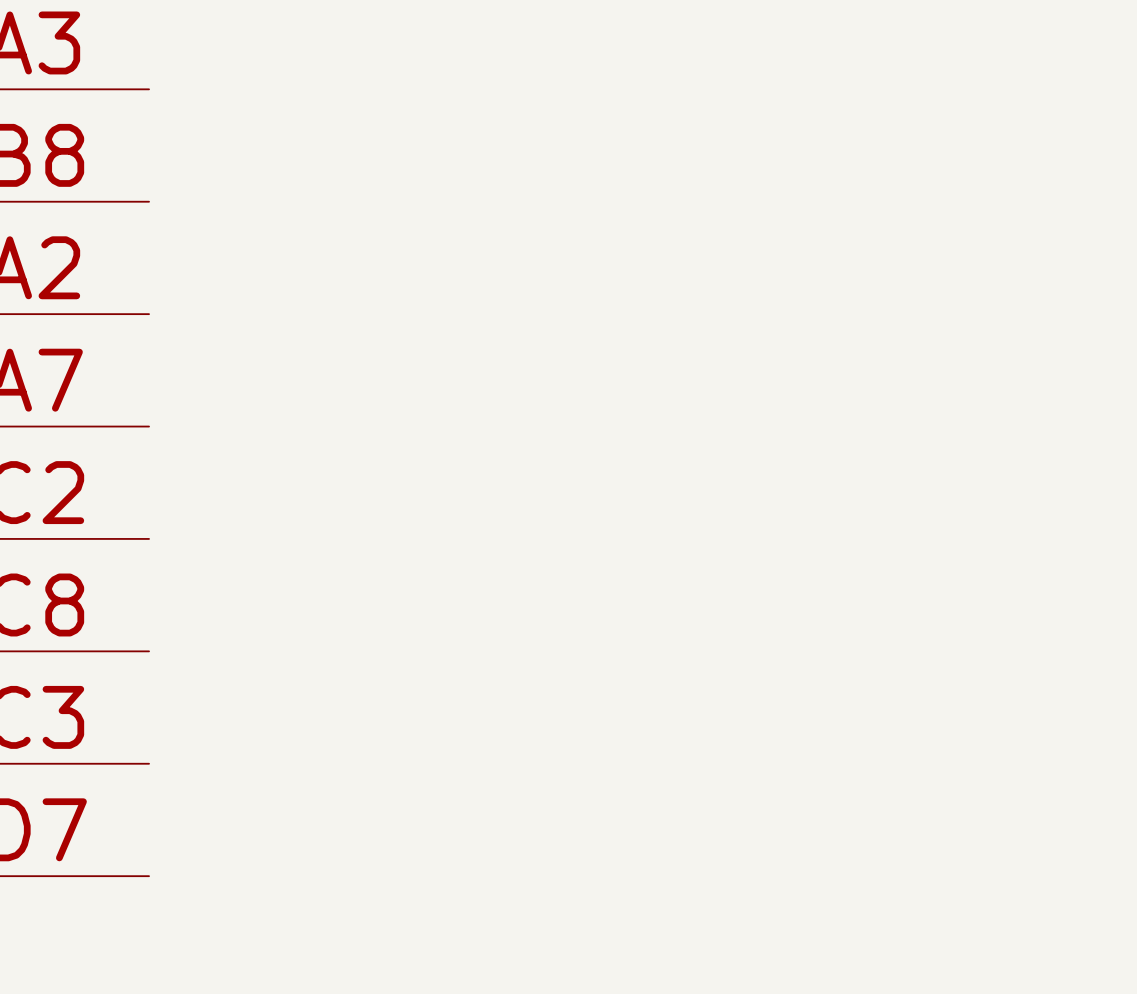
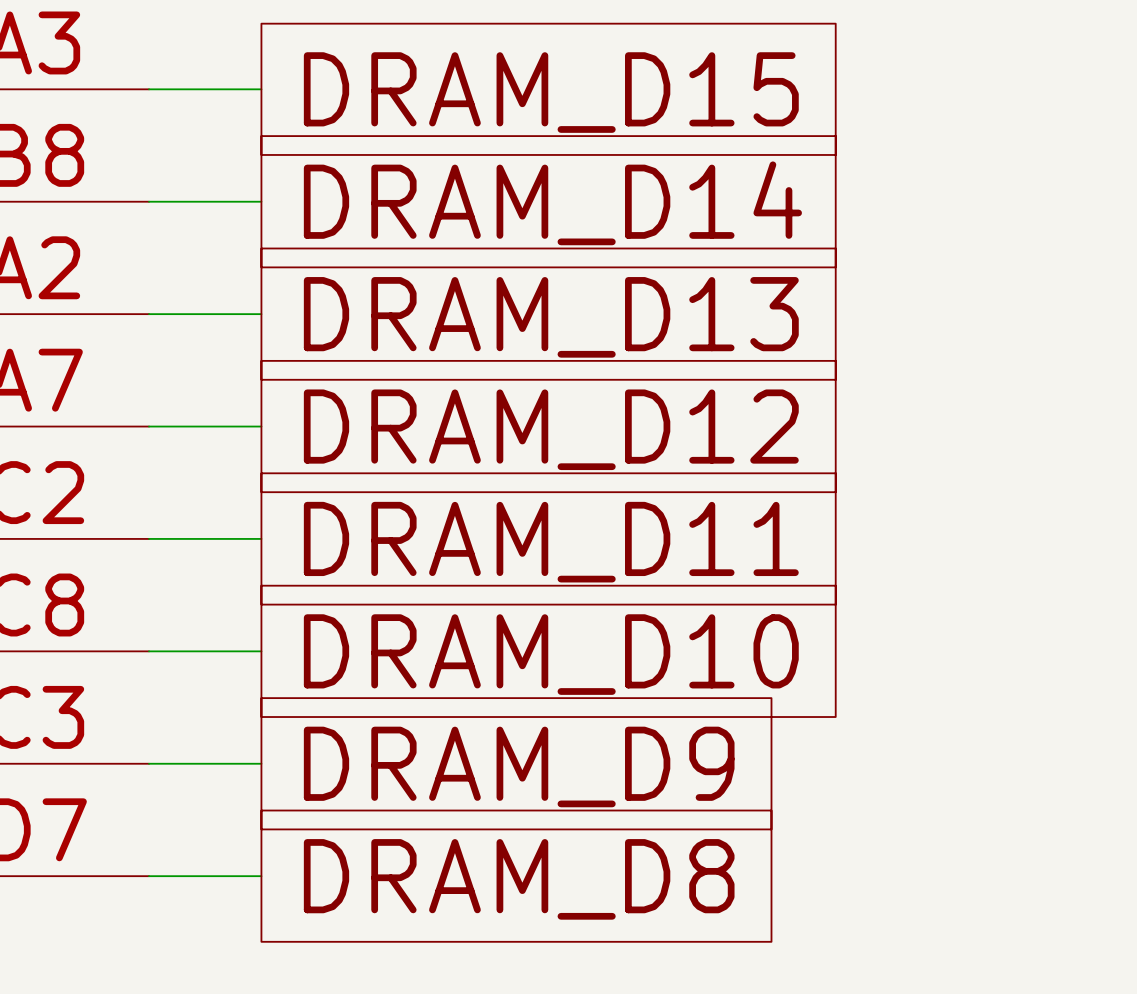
wire: none -> (149, 89) (261, 89)
global label: none -> DRAM_D15 (551, 92)
wire: none -> (149, 201) (261, 201)
global label: none -> DRAM_D14 (552, 203)
wire: none -> (149, 314) (261, 314)
global label: none -> DRAM_D13 (551, 317)
wire: none -> (149, 426) (261, 426)
global label: none -> DRAM_D12 (551, 429)
wire: none -> (149, 538) (261, 538)
global label: none -> DRAM_D11 (551, 542)
wire: none -> (149, 651) (261, 651)
global label: none -> DRAM_D10 (551, 654)
wire: none -> (149, 763) (261, 763)
global label: none -> DRAM_D9 (519, 766)
wire: none -> (149, 876) (261, 876)
global label: none -> DRAM_D8 (519, 879)

